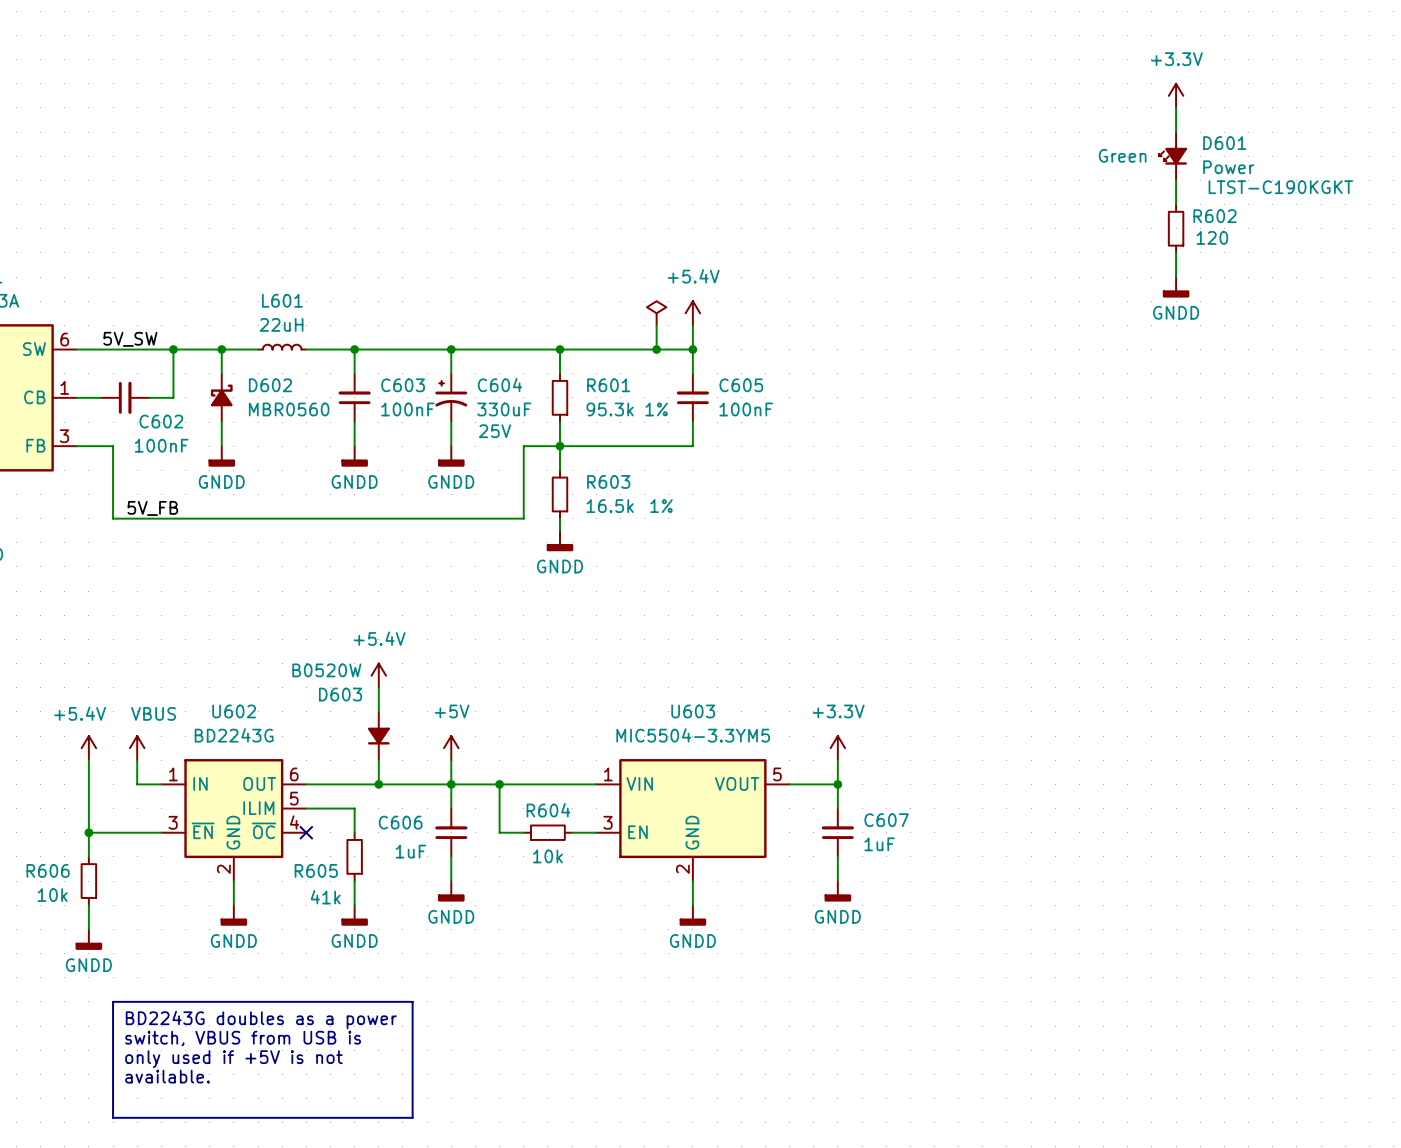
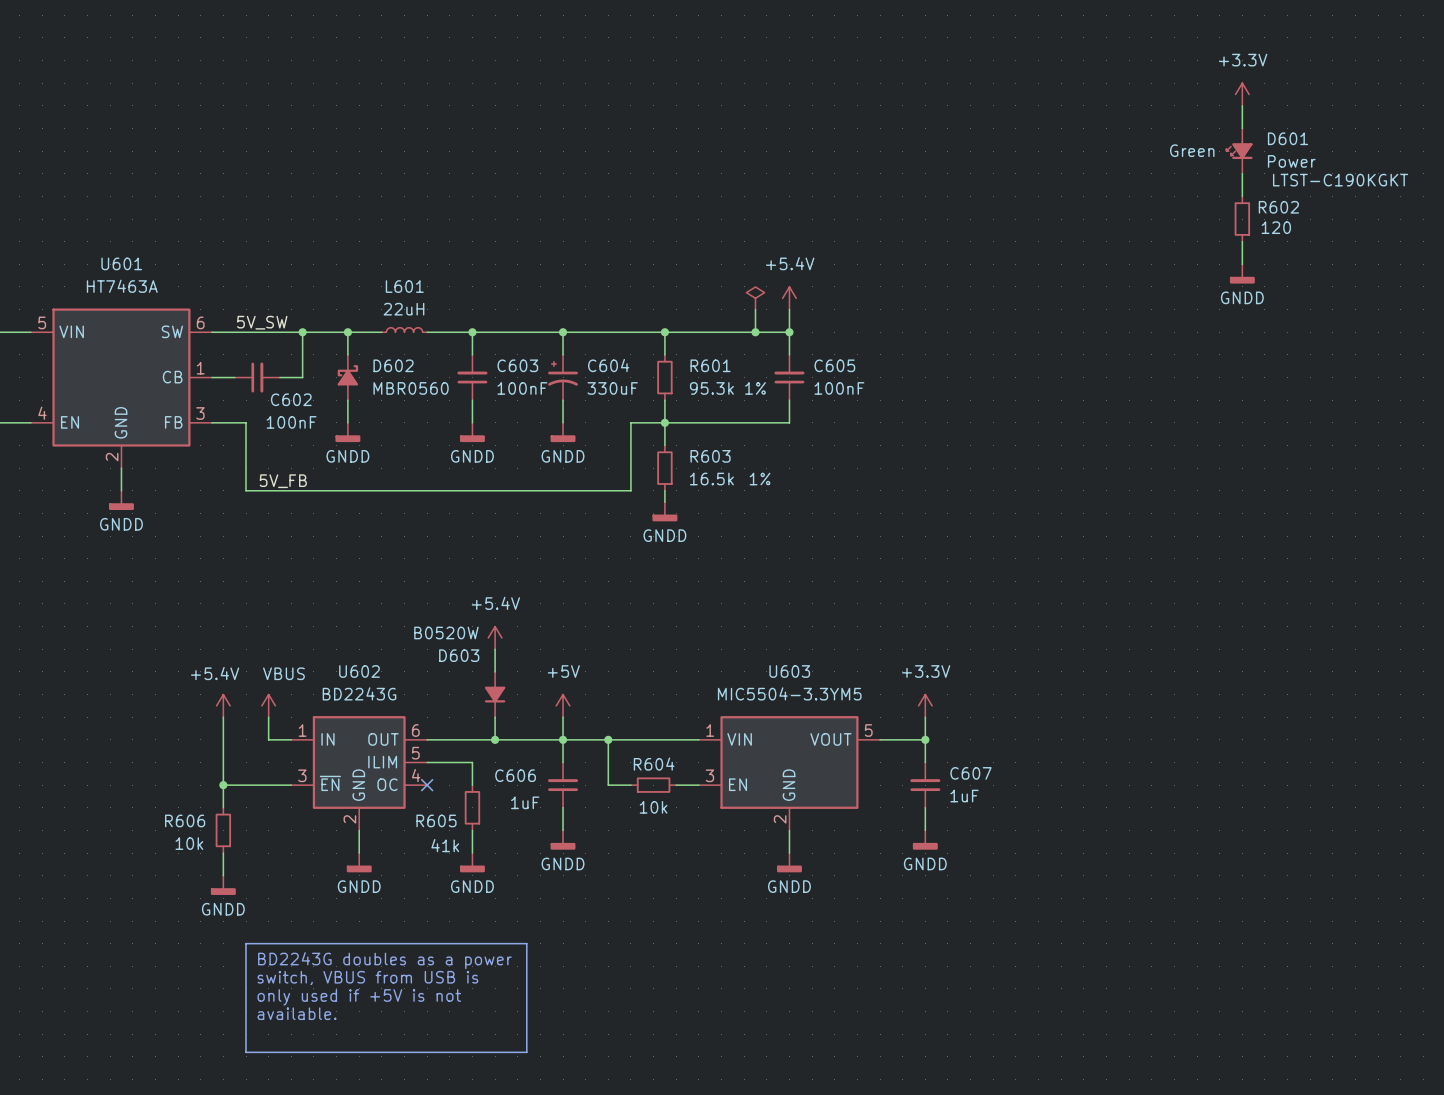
C604 text: 25V (495, 431) -> none
U602 pin name: ~{OC} (264, 830) -> OC (387, 784)

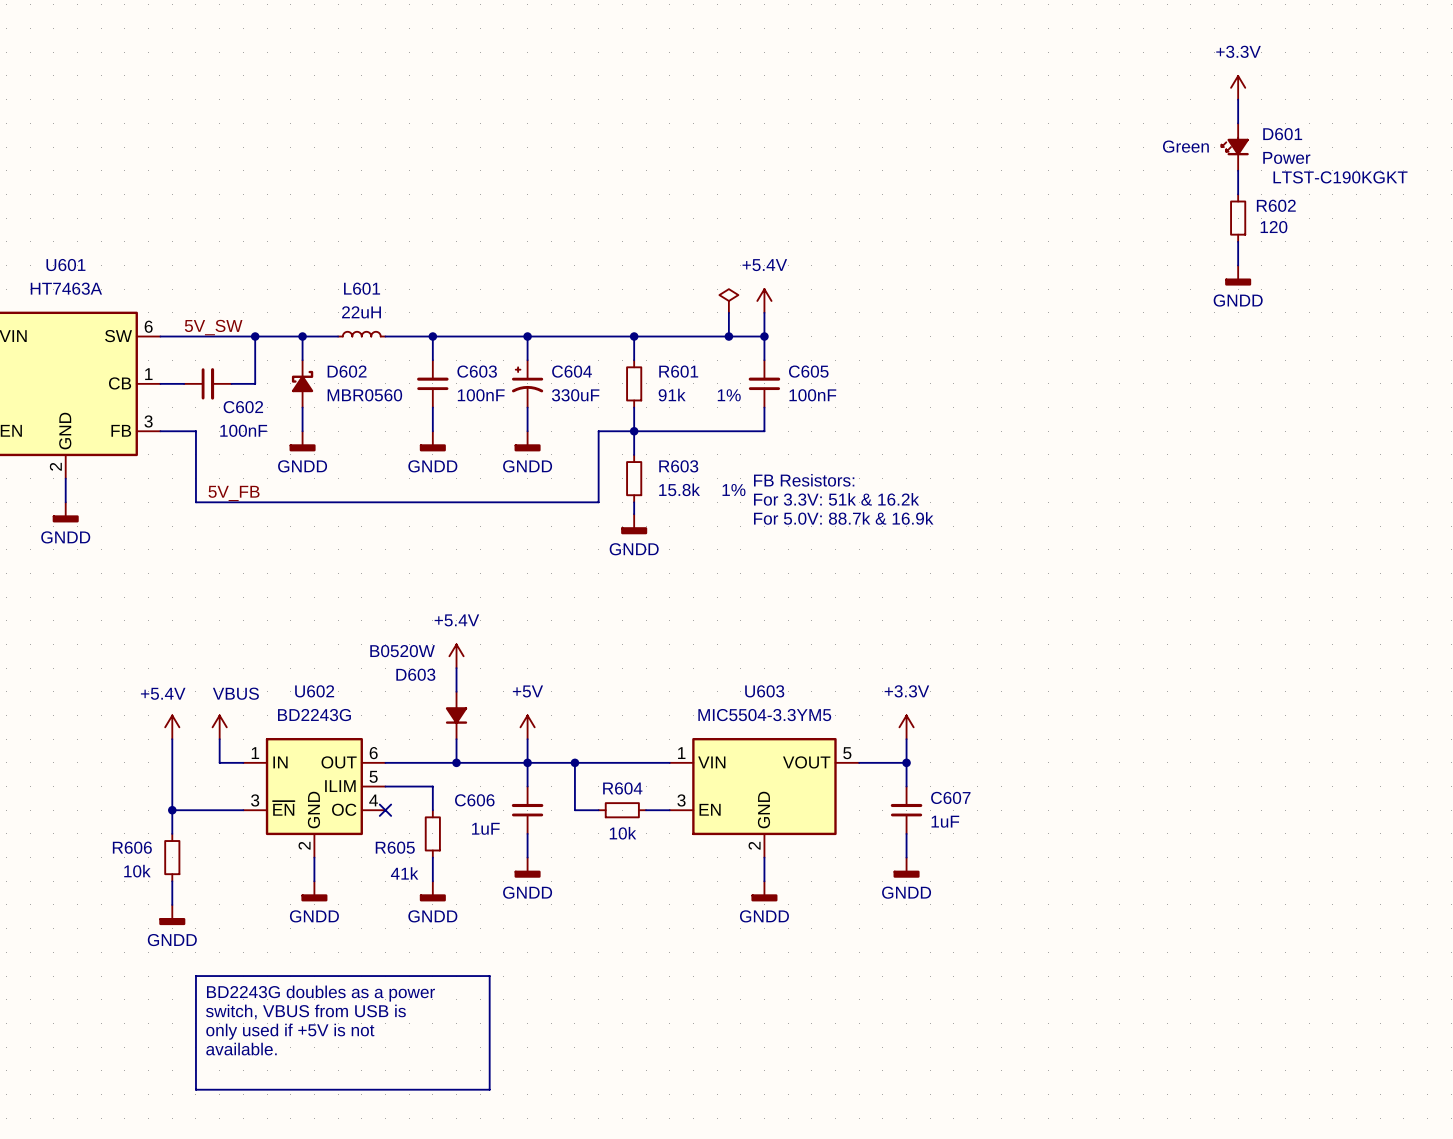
R601 value: 95.3k (711, 388) -> 91k (672, 395)
text: none -> FB Resistors: (804, 480)
R603 value: 16.5k (711, 479) -> 15.8k (679, 489)
text: none -> For 3.3V: 51k & 16.2k (836, 499)
text: none -> For 5.0V: 88.7k & 16.9k (843, 518)

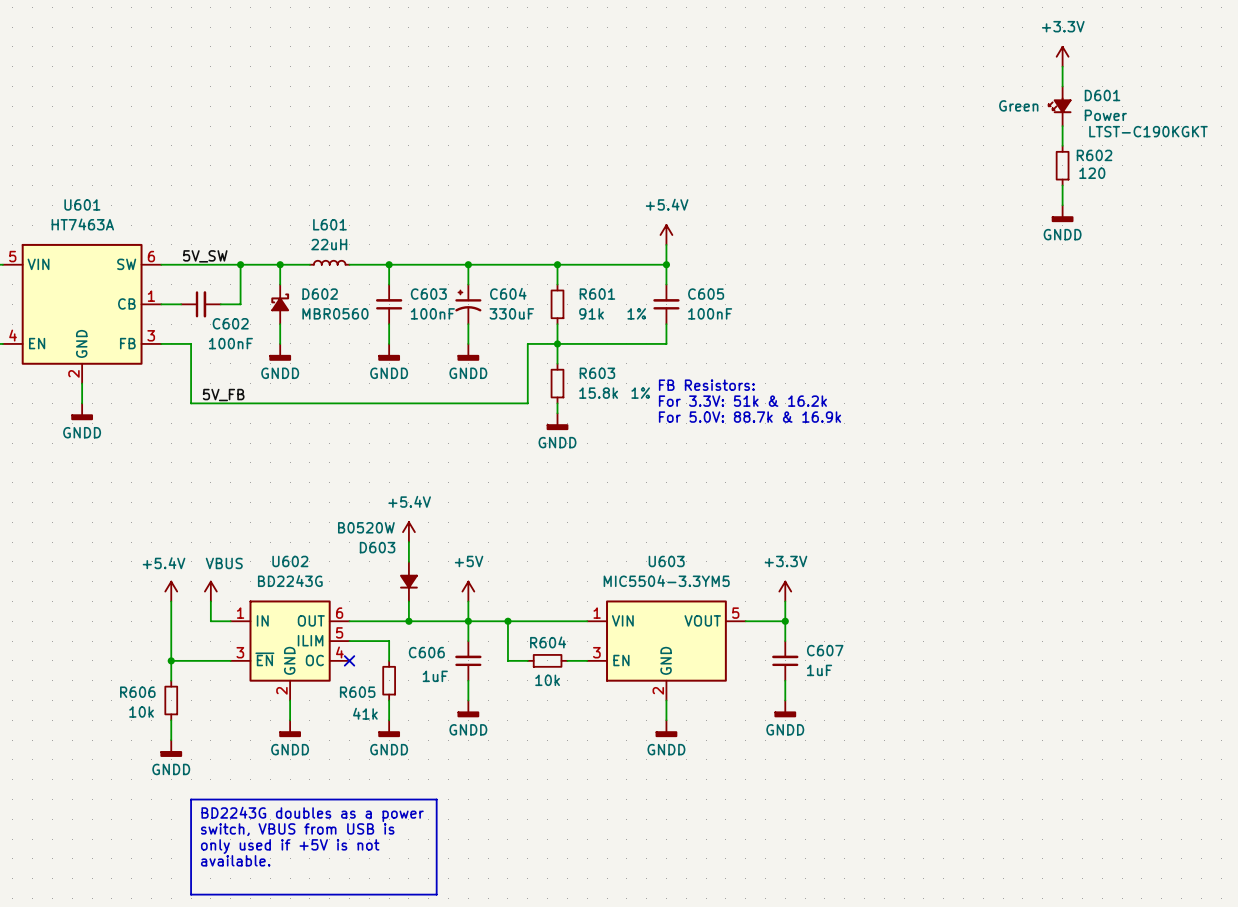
power symbol: (728, 300) -> none
wire: (728, 312) (728, 336) -> none
junction: (728, 336) -> none

